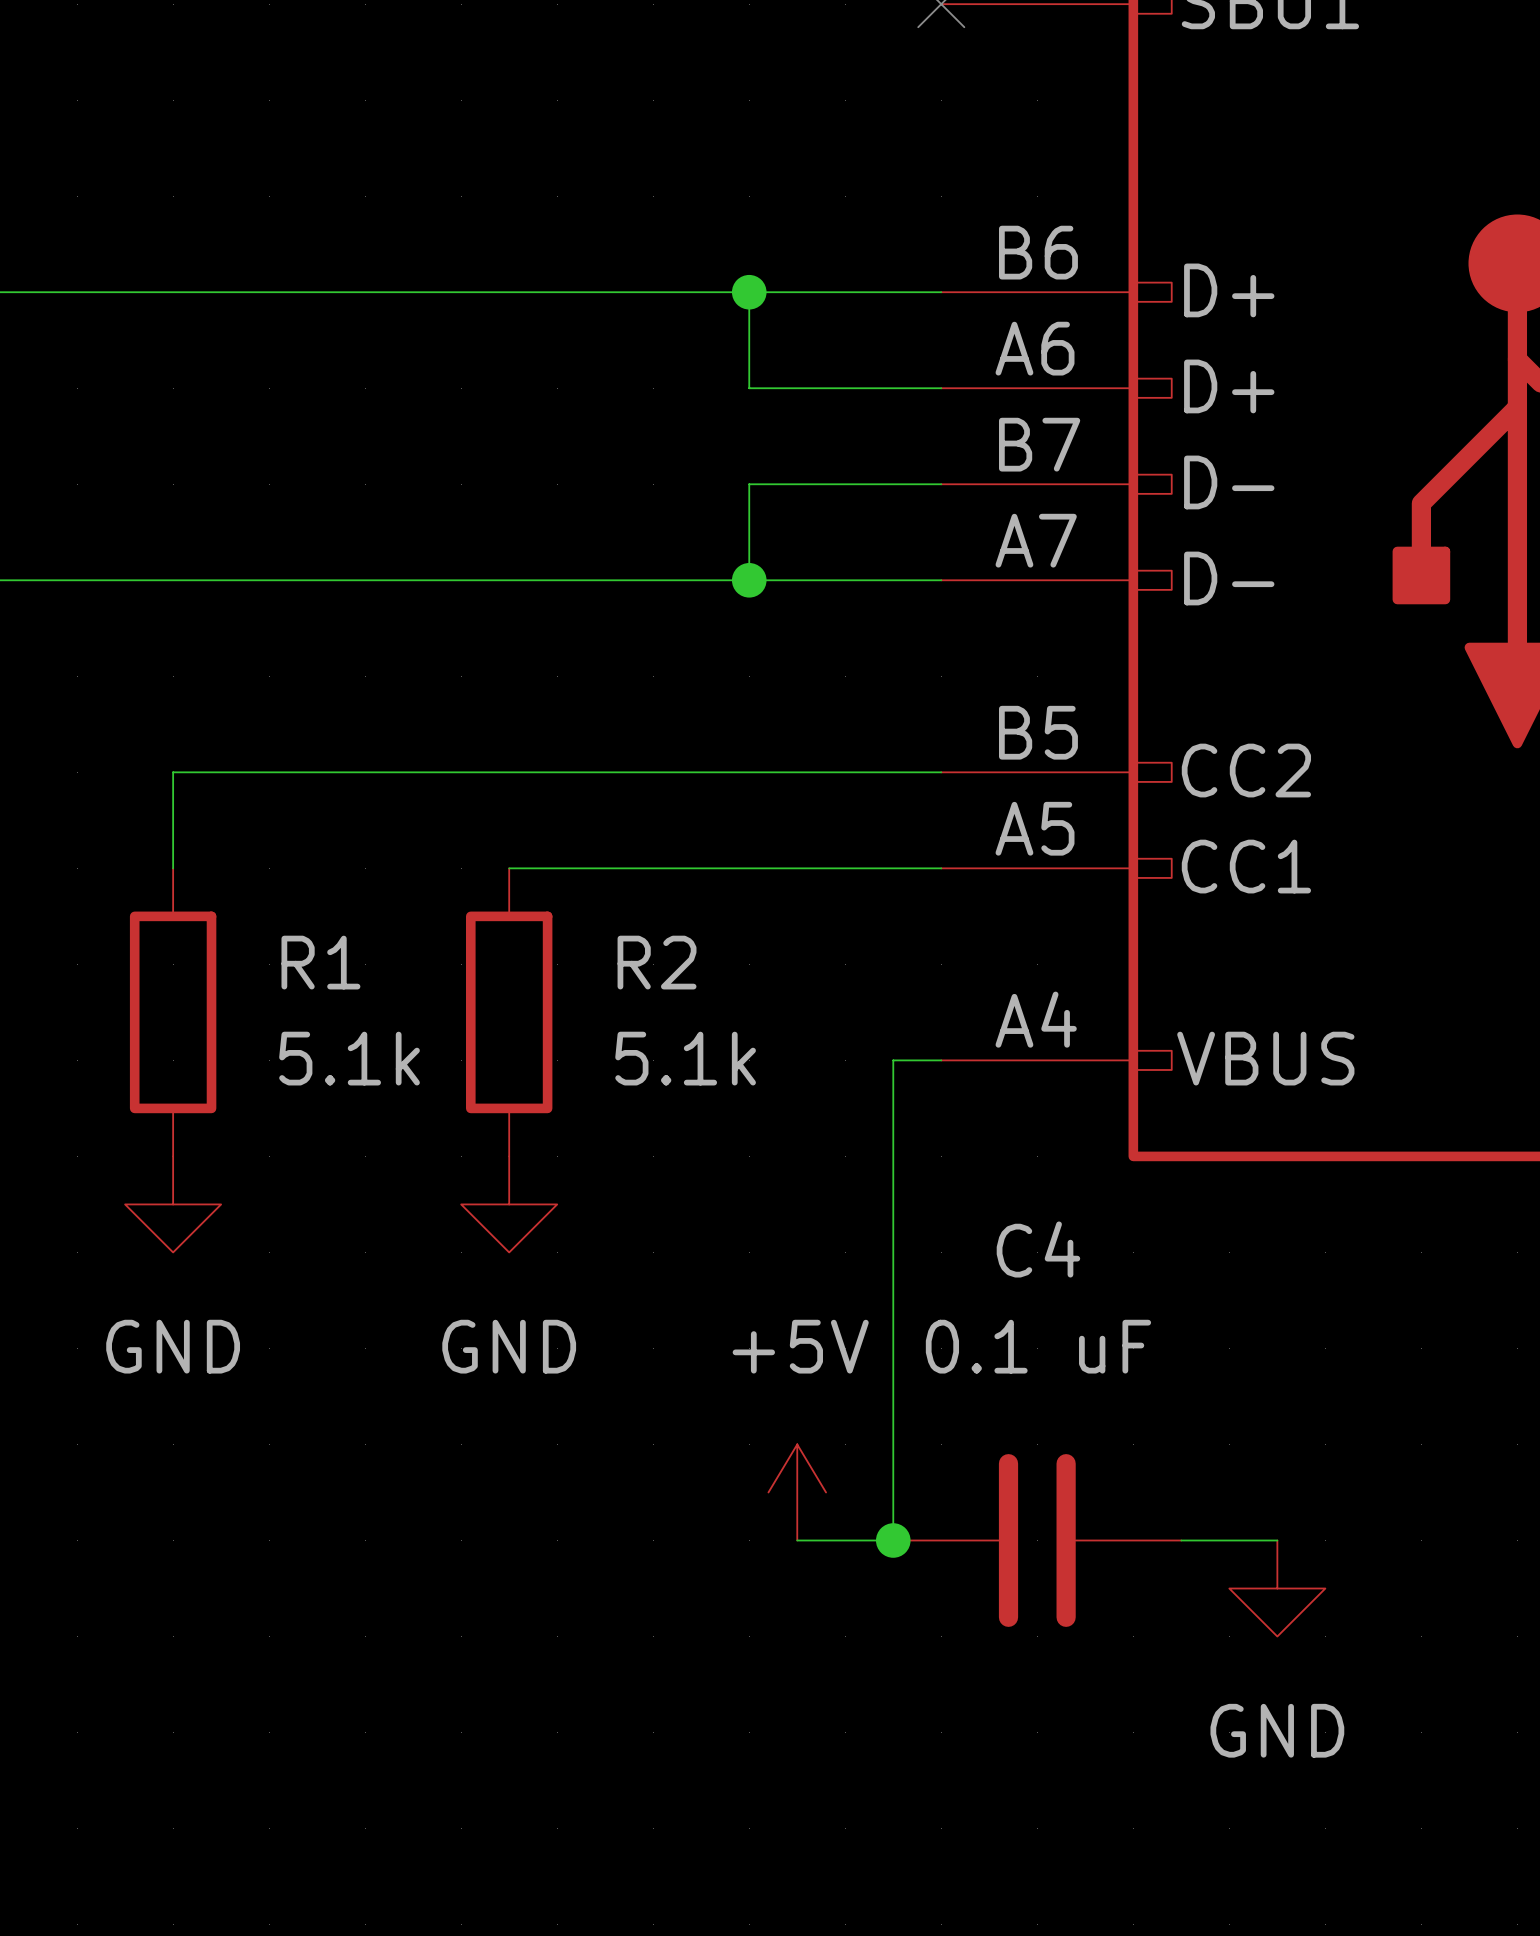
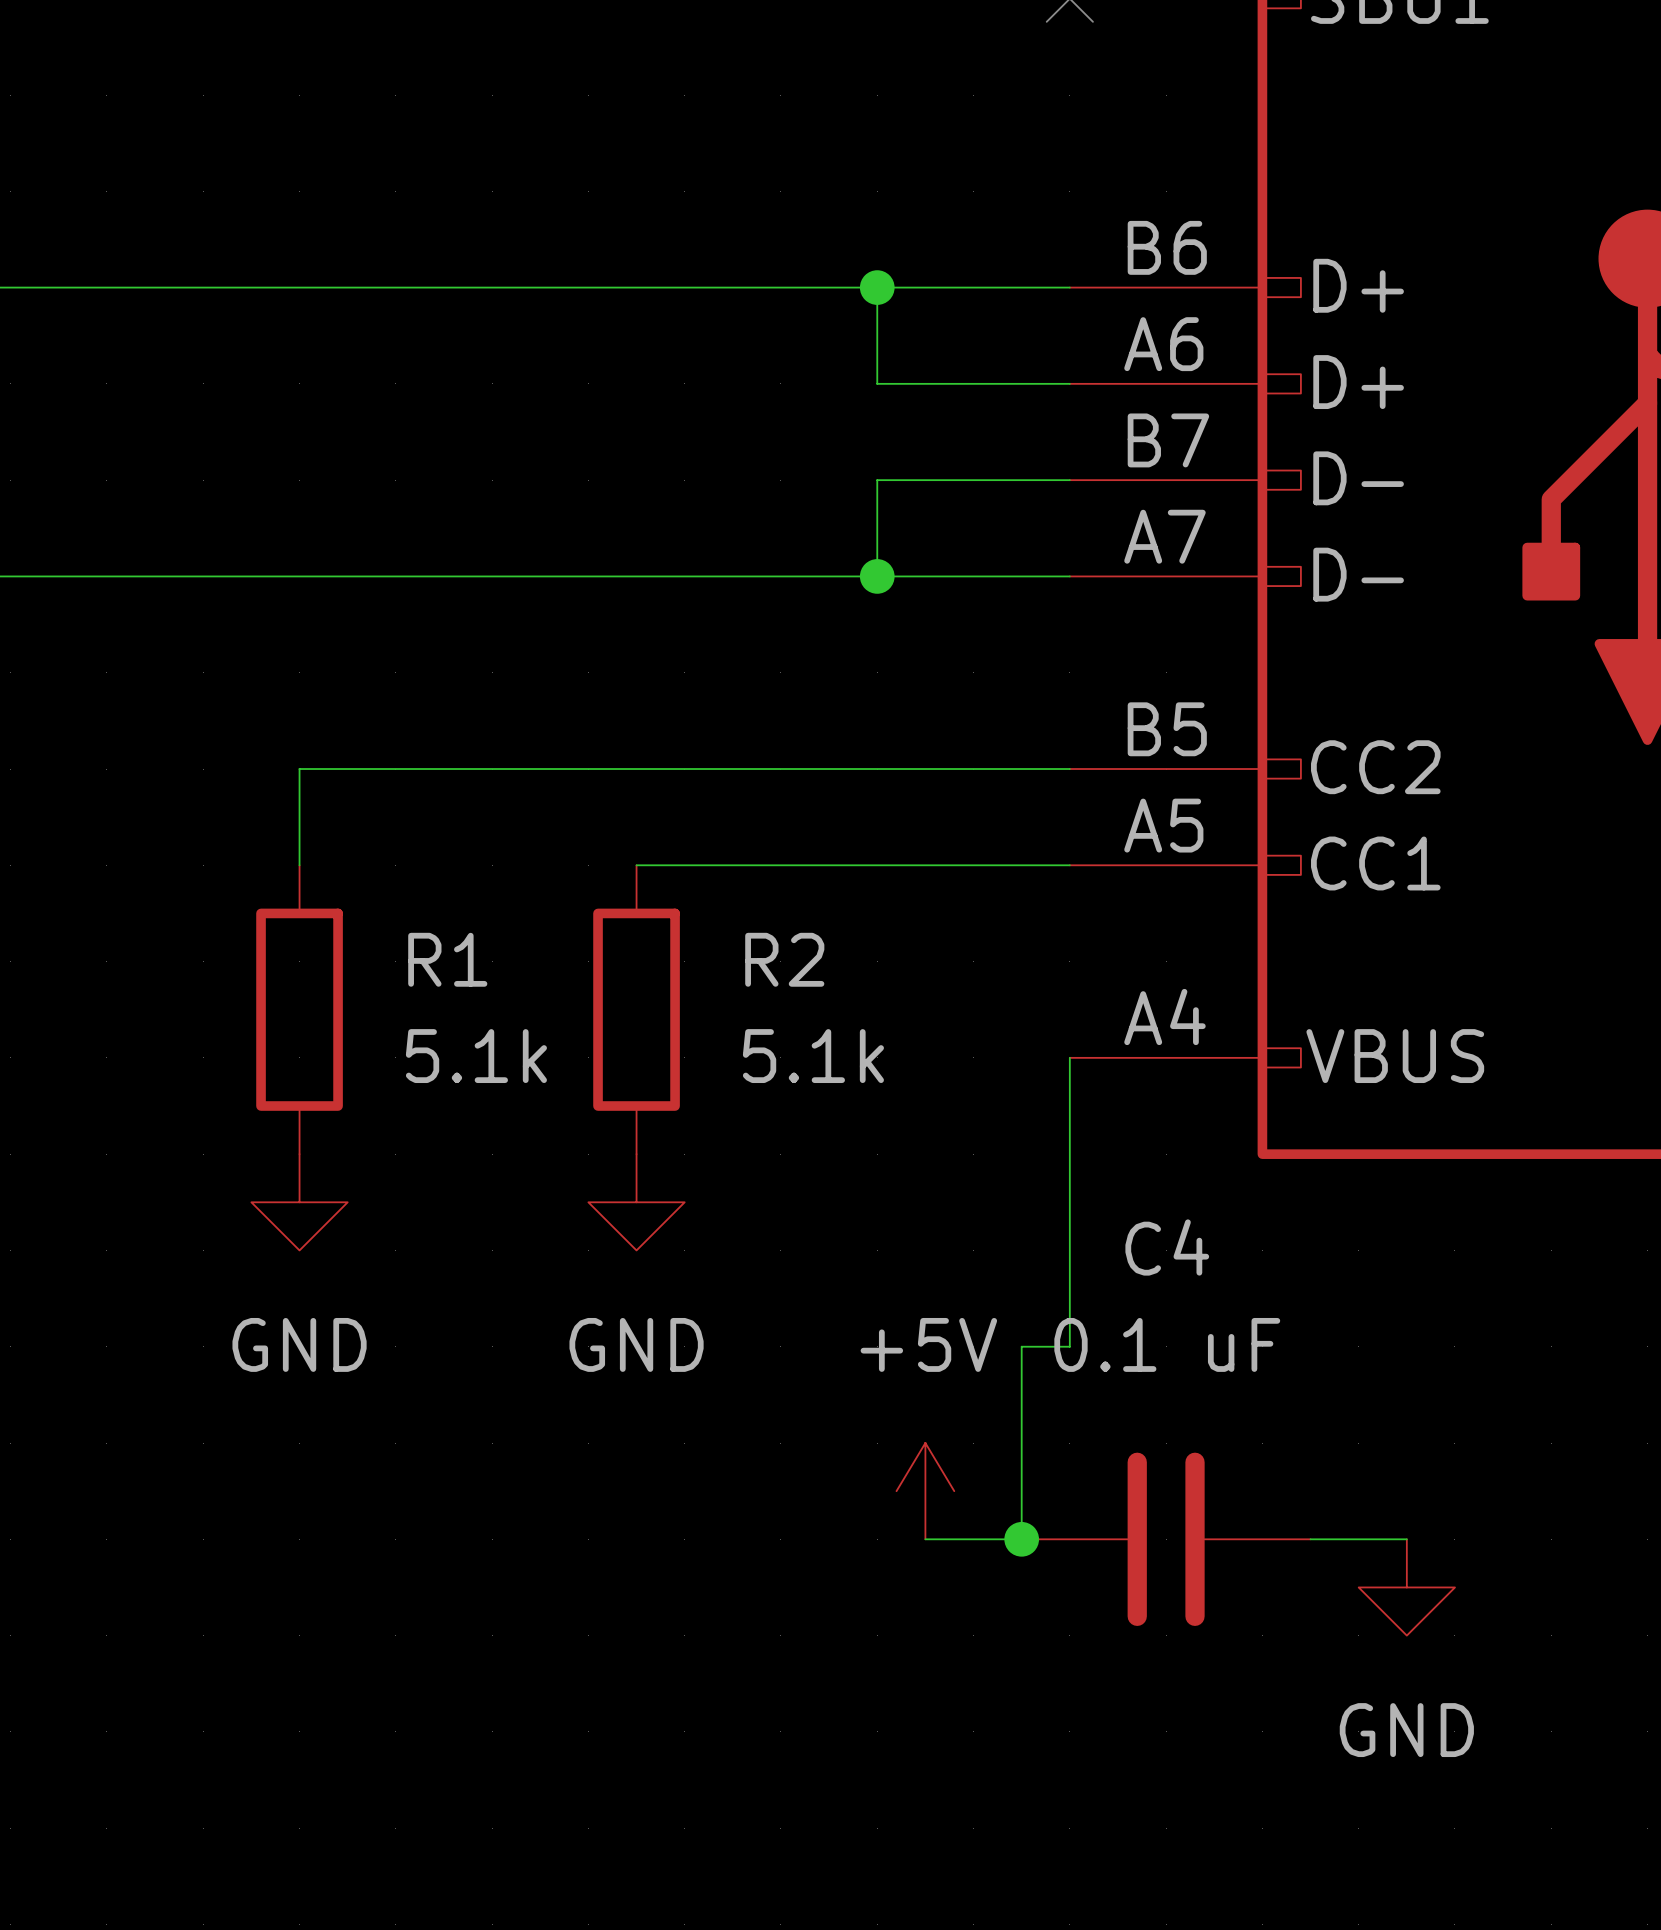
wire: (941, 1060) (893, 1060) (893, 1348) -> (1069, 1057) (1069, 1346) (1021, 1346)

